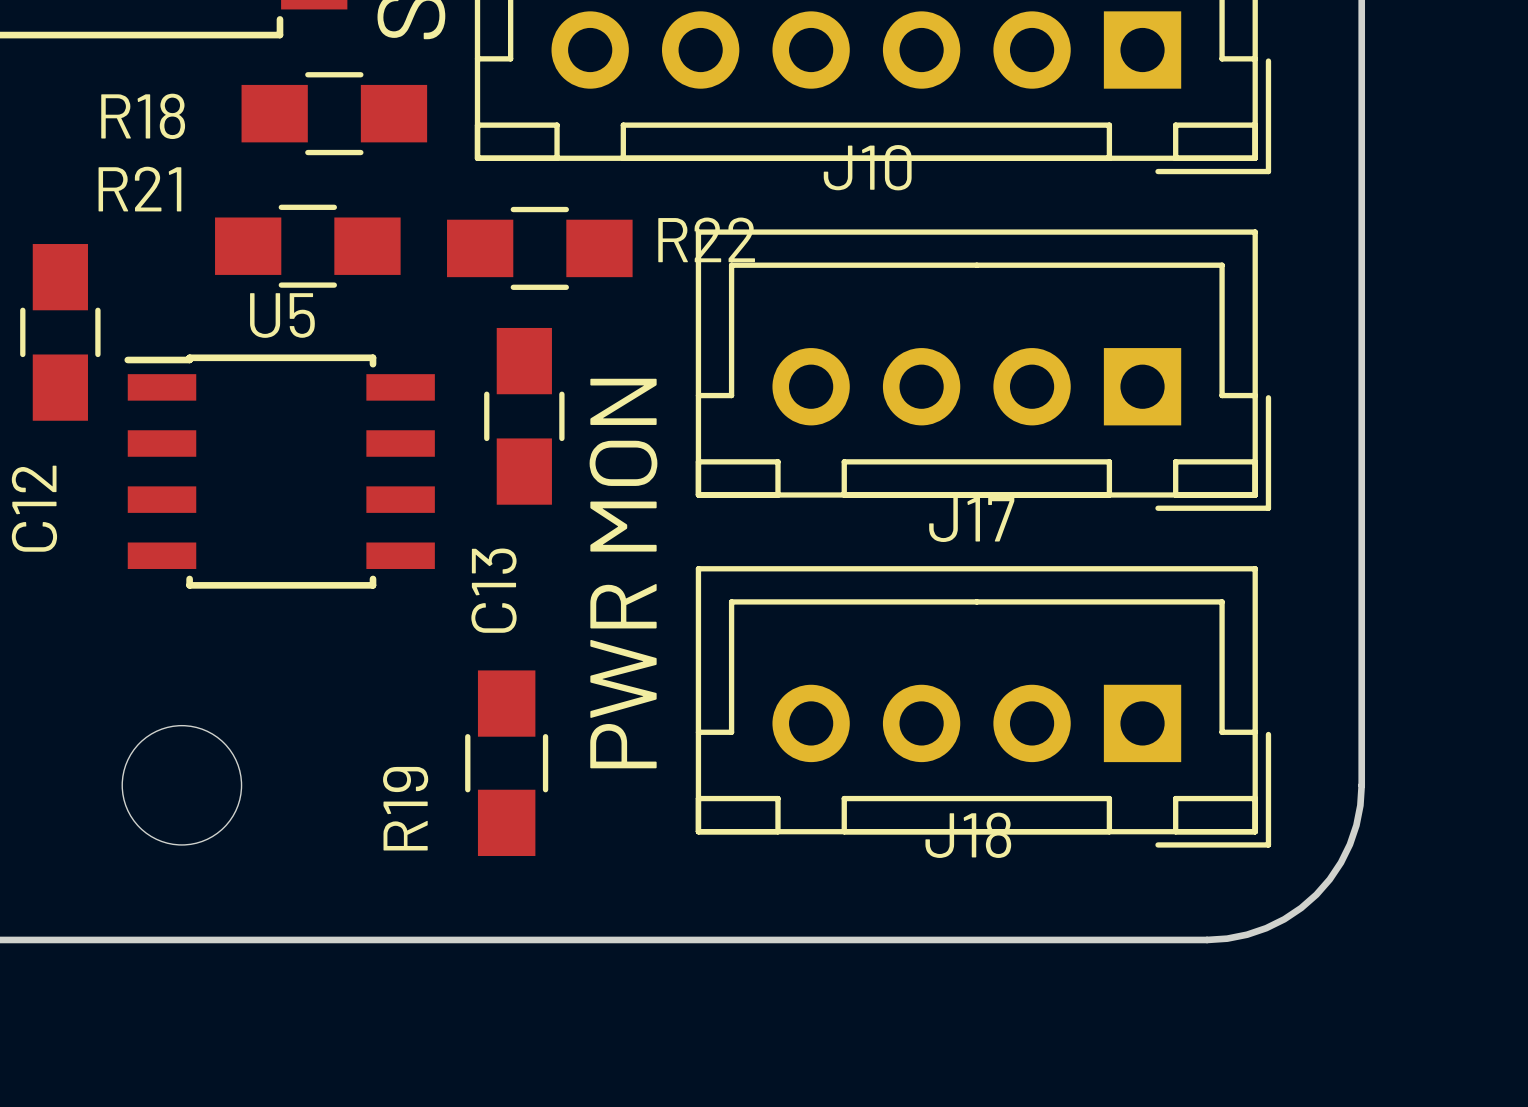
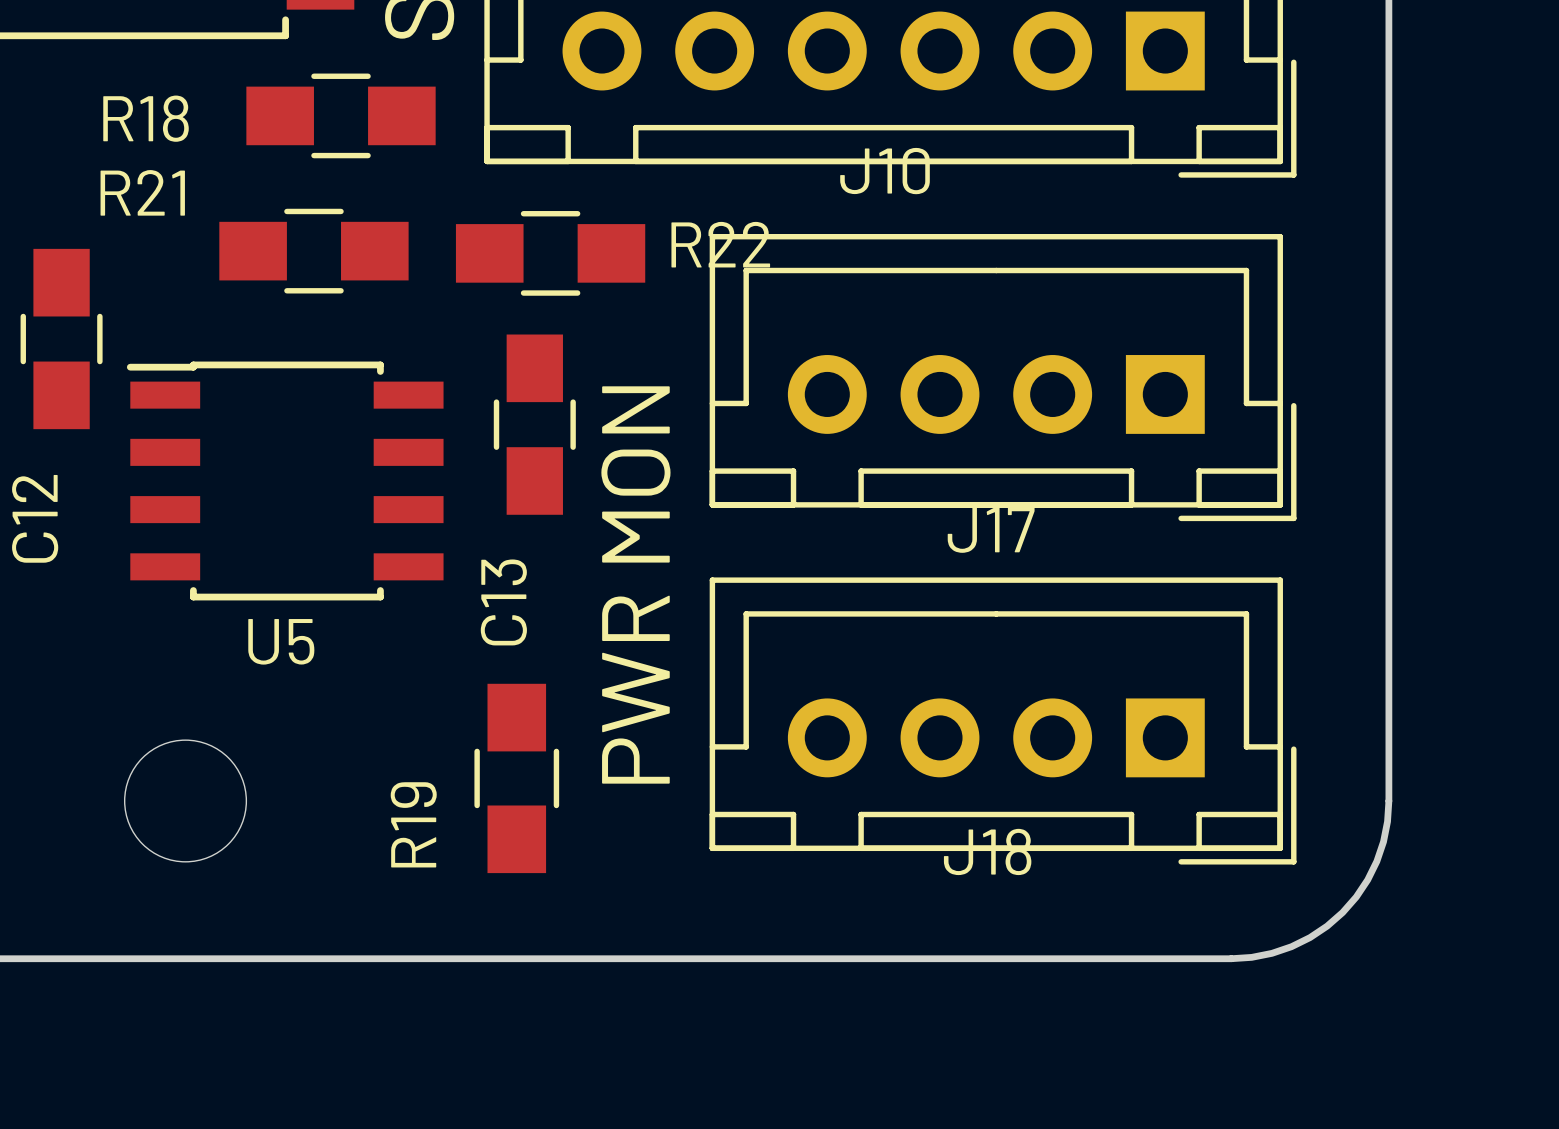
U5 name position: U5 (282, 315) -> U5 (281, 641)

